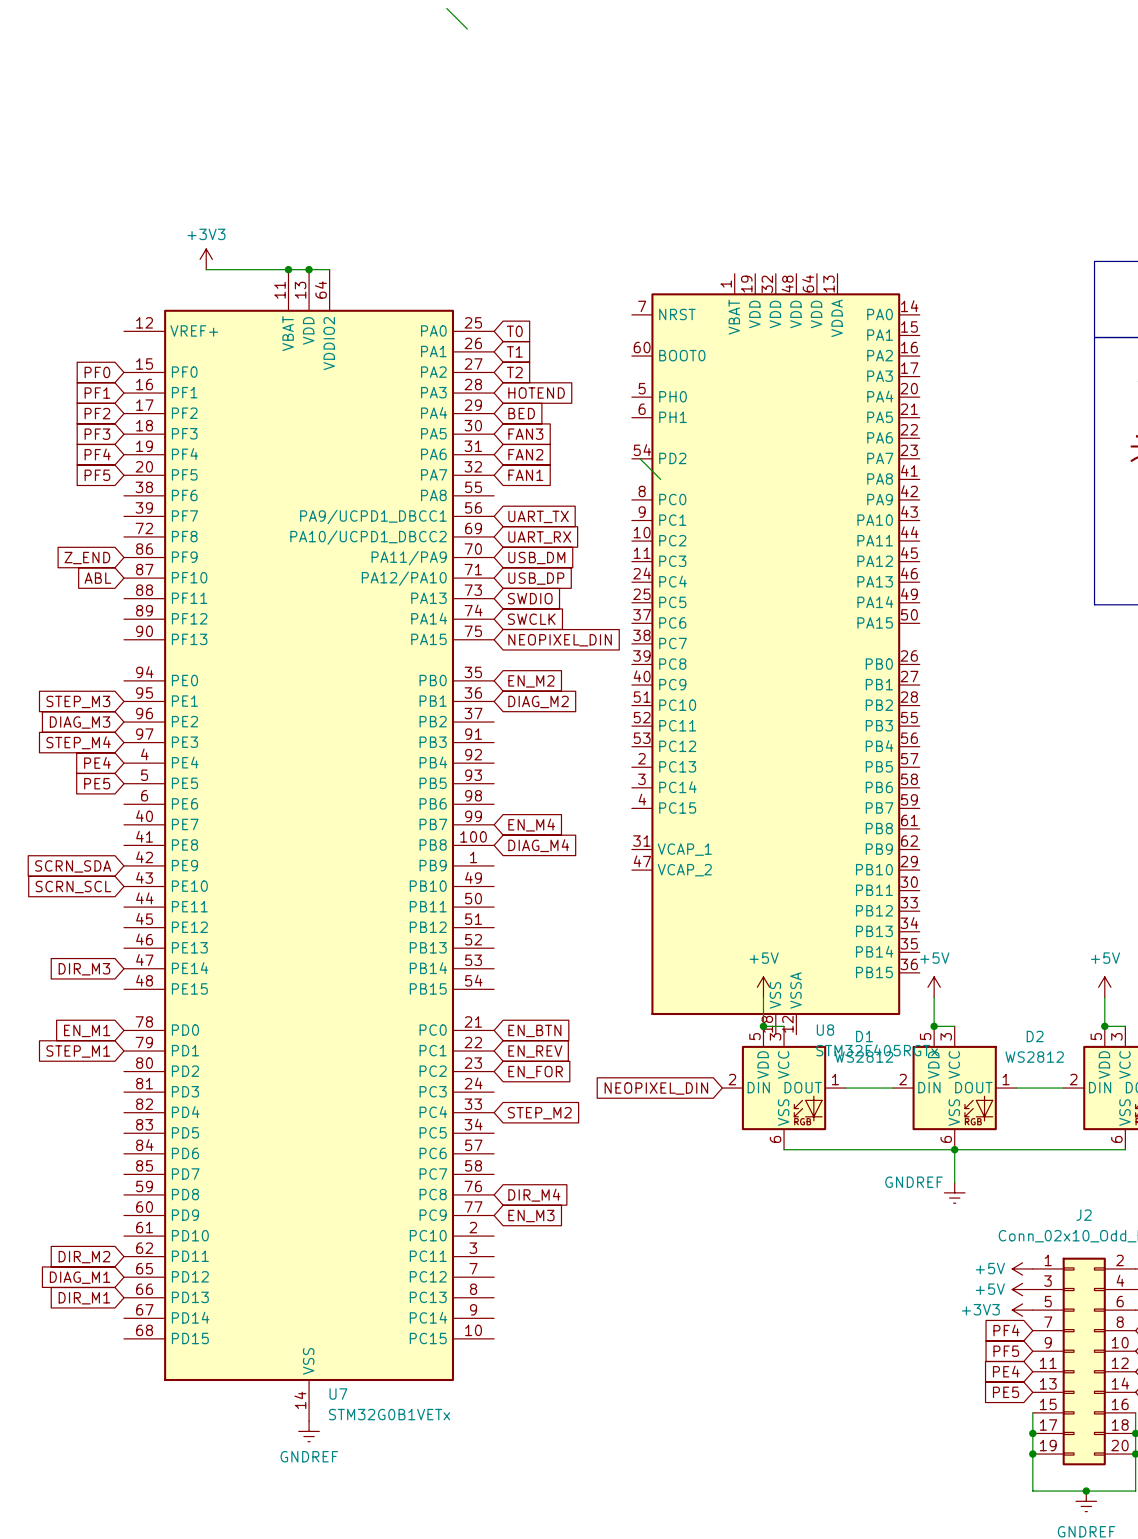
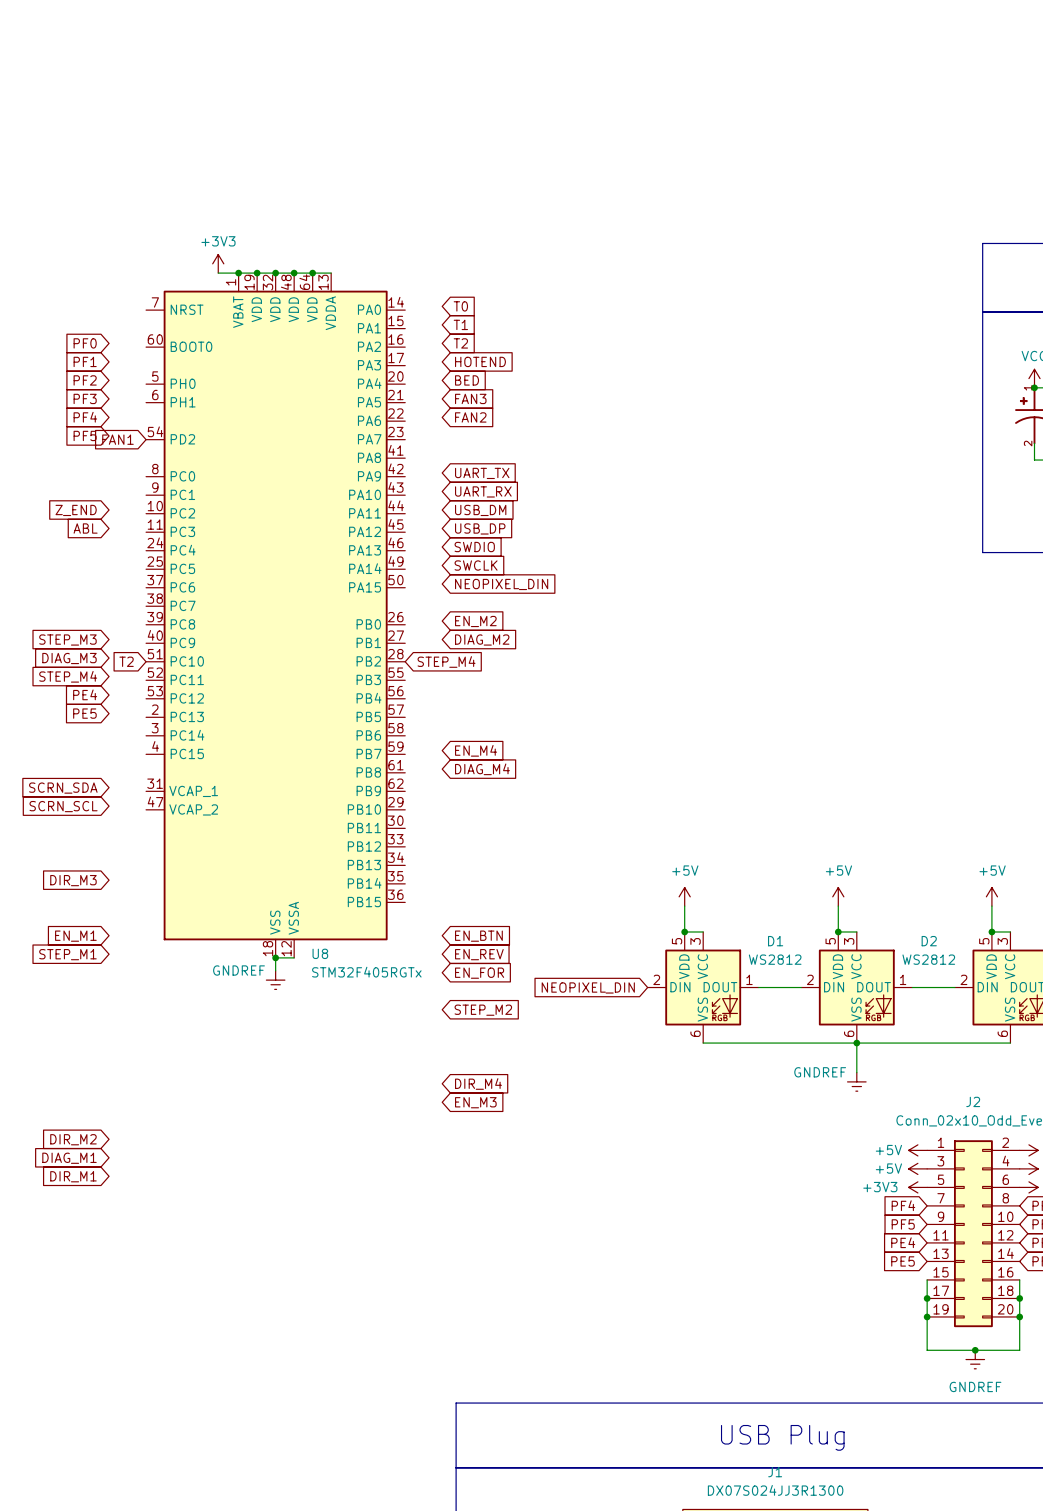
wire: (446, 8) (467, 29) -> none
power symbol position: +3V3 (206, 259) -> +3V3 (218, 263)
wire: (206, 269) (329, 269) -> none
junction: (288, 269) -> none
junction: (309, 269) -> none
wire: none -> (218, 273) (331, 273)
junction: none -> (238, 273)
junction: none -> (257, 273)
junction: none -> (275, 273)
junction: none -> (294, 273)
junction: none -> (312, 273)
wire: (640, 458) (660, 479) -> none
global label: FAN1 (525, 475) -> none
global label: none -> FAN1 (117, 439)
U8 position: (775, 654) -> (275, 615)
global label: none -> T2 (126, 661)
global label: none -> STEP_M4 (446, 661)
U7: STM32G0B1VETx (309, 845) -> none
junction: none -> (275, 957)
power symbol: none -> GNDREF (275, 980)
power symbol: GNDREF (309, 1431) -> none

